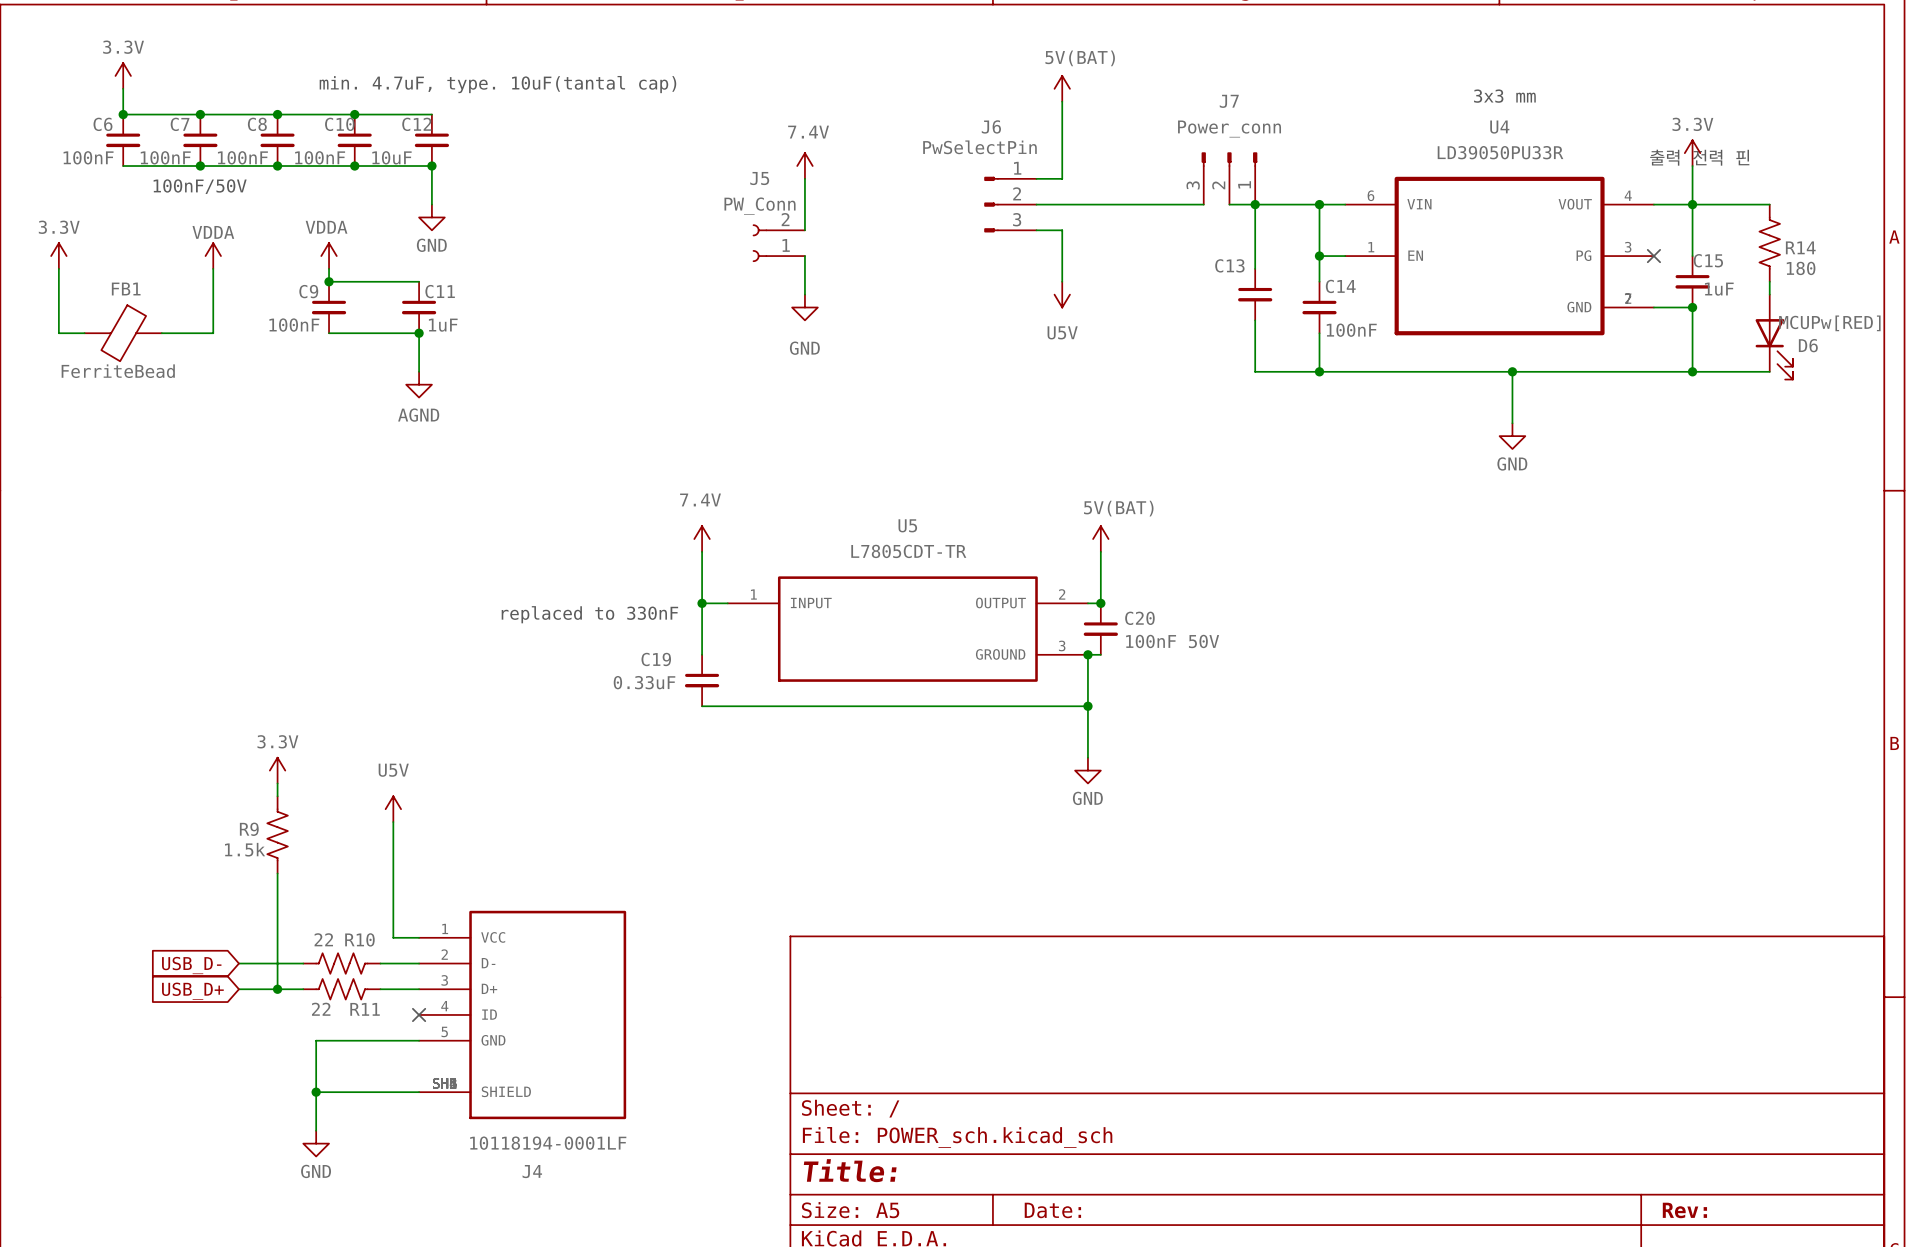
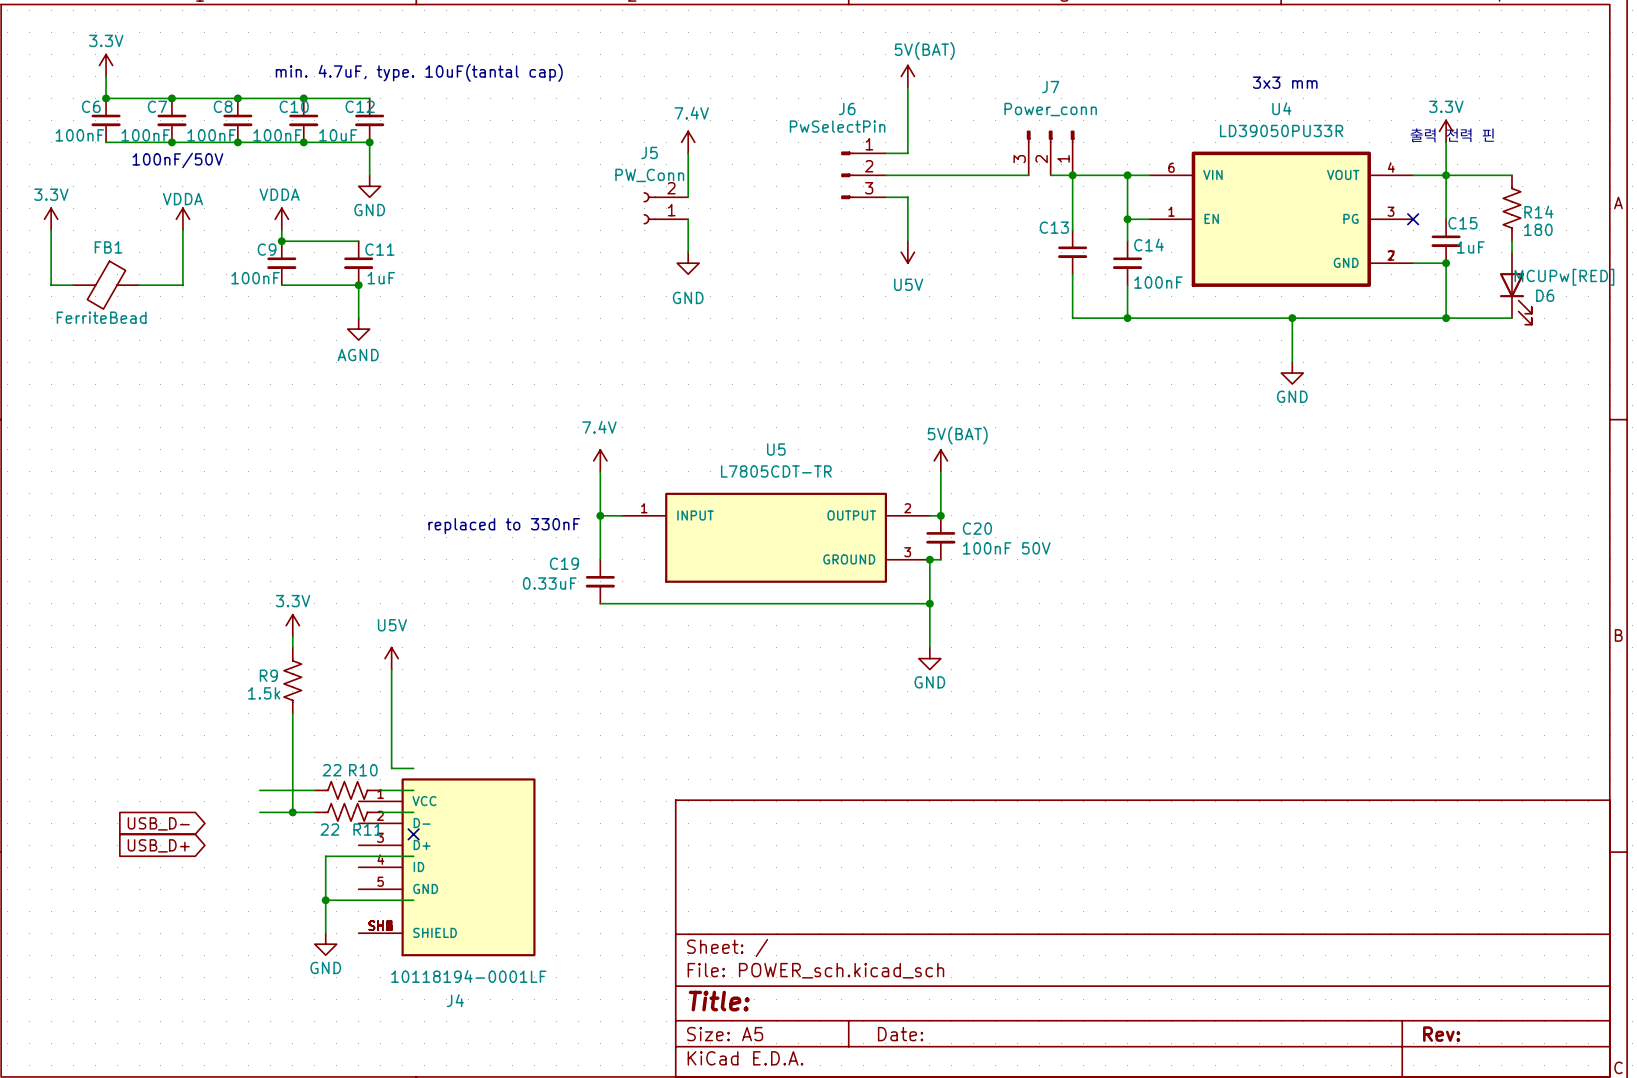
power symbol position: 3.3V (277, 770) -> 3.3V (292, 625)
wire: (277, 783) (277, 796) -> (292, 636) (292, 647)
power symbol position: U5V (393, 809) -> U5V (391, 658)
wire: (393, 822) (393, 937) (419, 937) -> (391, 669) (391, 768) (413, 768)
R9 position: (277, 834) -> (292, 680)
wire: (277, 873) (277, 989) -> (292, 713) (292, 812)
junction: none -> (292, 812)
wire: (238, 963) (303, 963) -> (259, 790) (314, 790)
R10 position: (341, 963) -> (347, 790)
wire: (380, 963) (419, 963) -> (380, 790) (413, 790)
no-connect mark: none -> (413, 834)
wire: (238, 989) (303, 989) -> (259, 812) (314, 812)
junction: (277, 989) -> none
R11 position: (341, 989) -> (347, 812)
wire: (380, 989) (419, 989) -> (380, 812) (413, 812)
no-connect mark: (419, 1014) -> none
wire: (419, 1040) (316, 1040) (316, 1130) -> (413, 856) (325, 856) (325, 933)
junction: none -> (325, 900)
wire: (316, 1092) (419, 1092) -> (325, 900) (413, 900)
junction: (316, 1092) -> none
power symbol position: GND (316, 1143) -> GND (325, 944)

